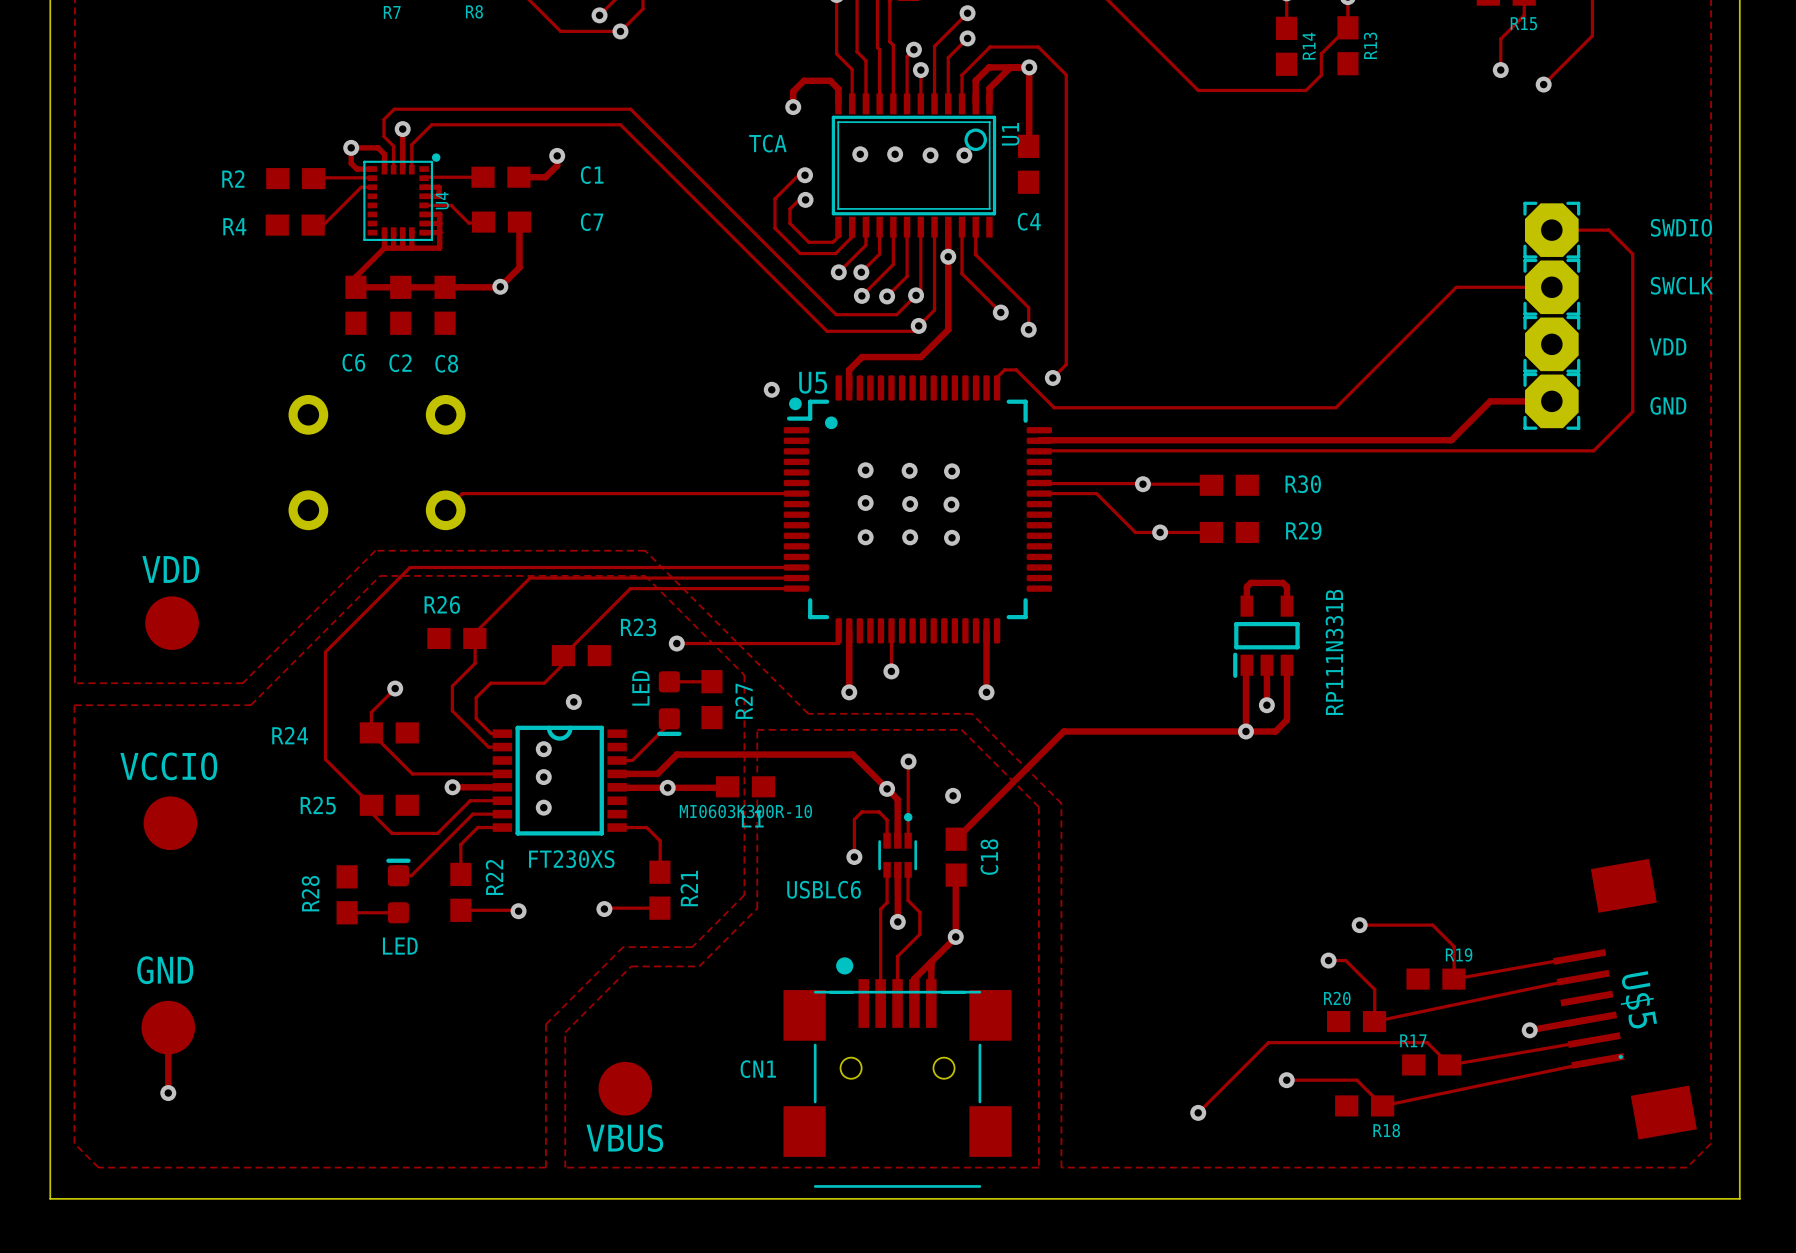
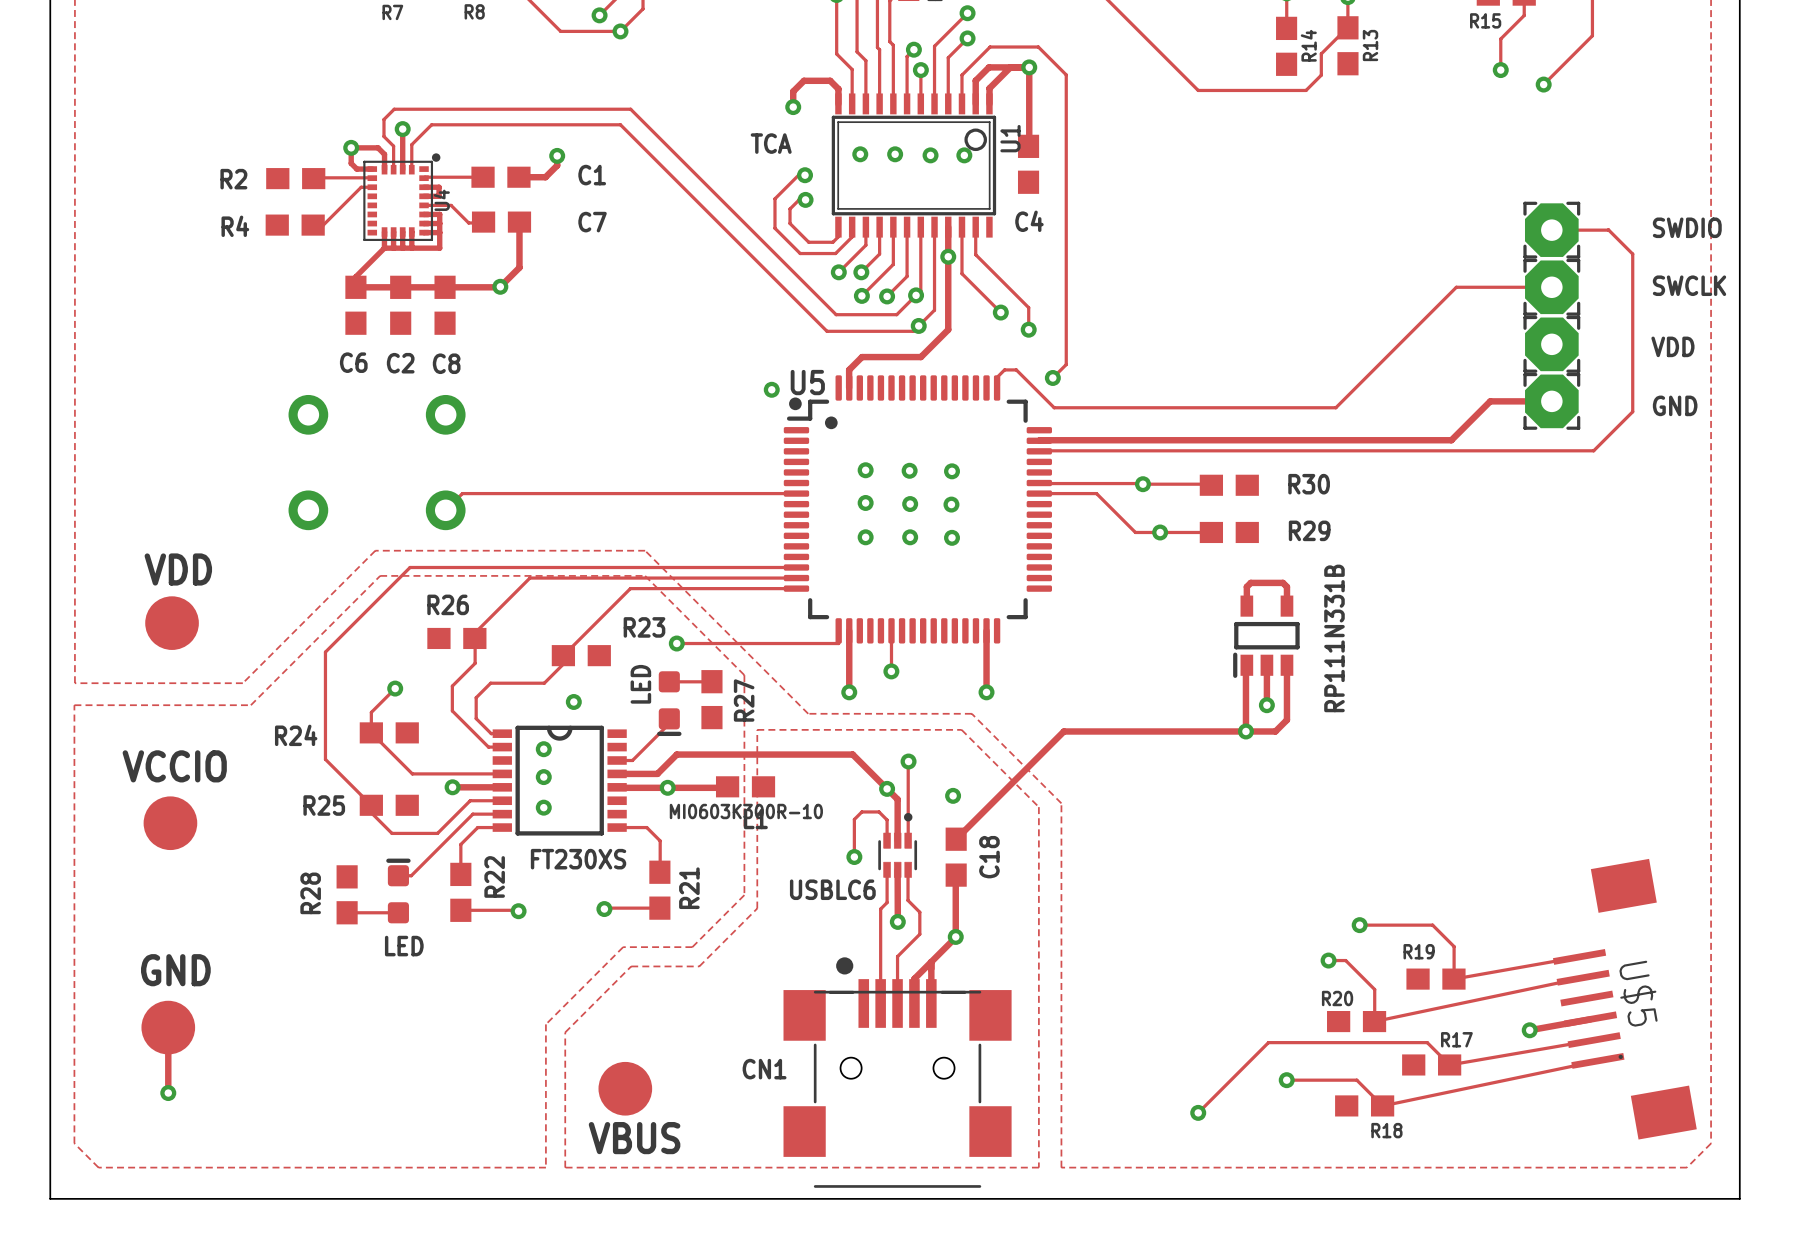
R15 name position: R15 (1523, 23) -> R15 (1485, 20)
R19 name position: R19 (1459, 954) -> R19 (1419, 951)
R17 name position: R17 (1413, 1040) -> R17 (1456, 1039)

